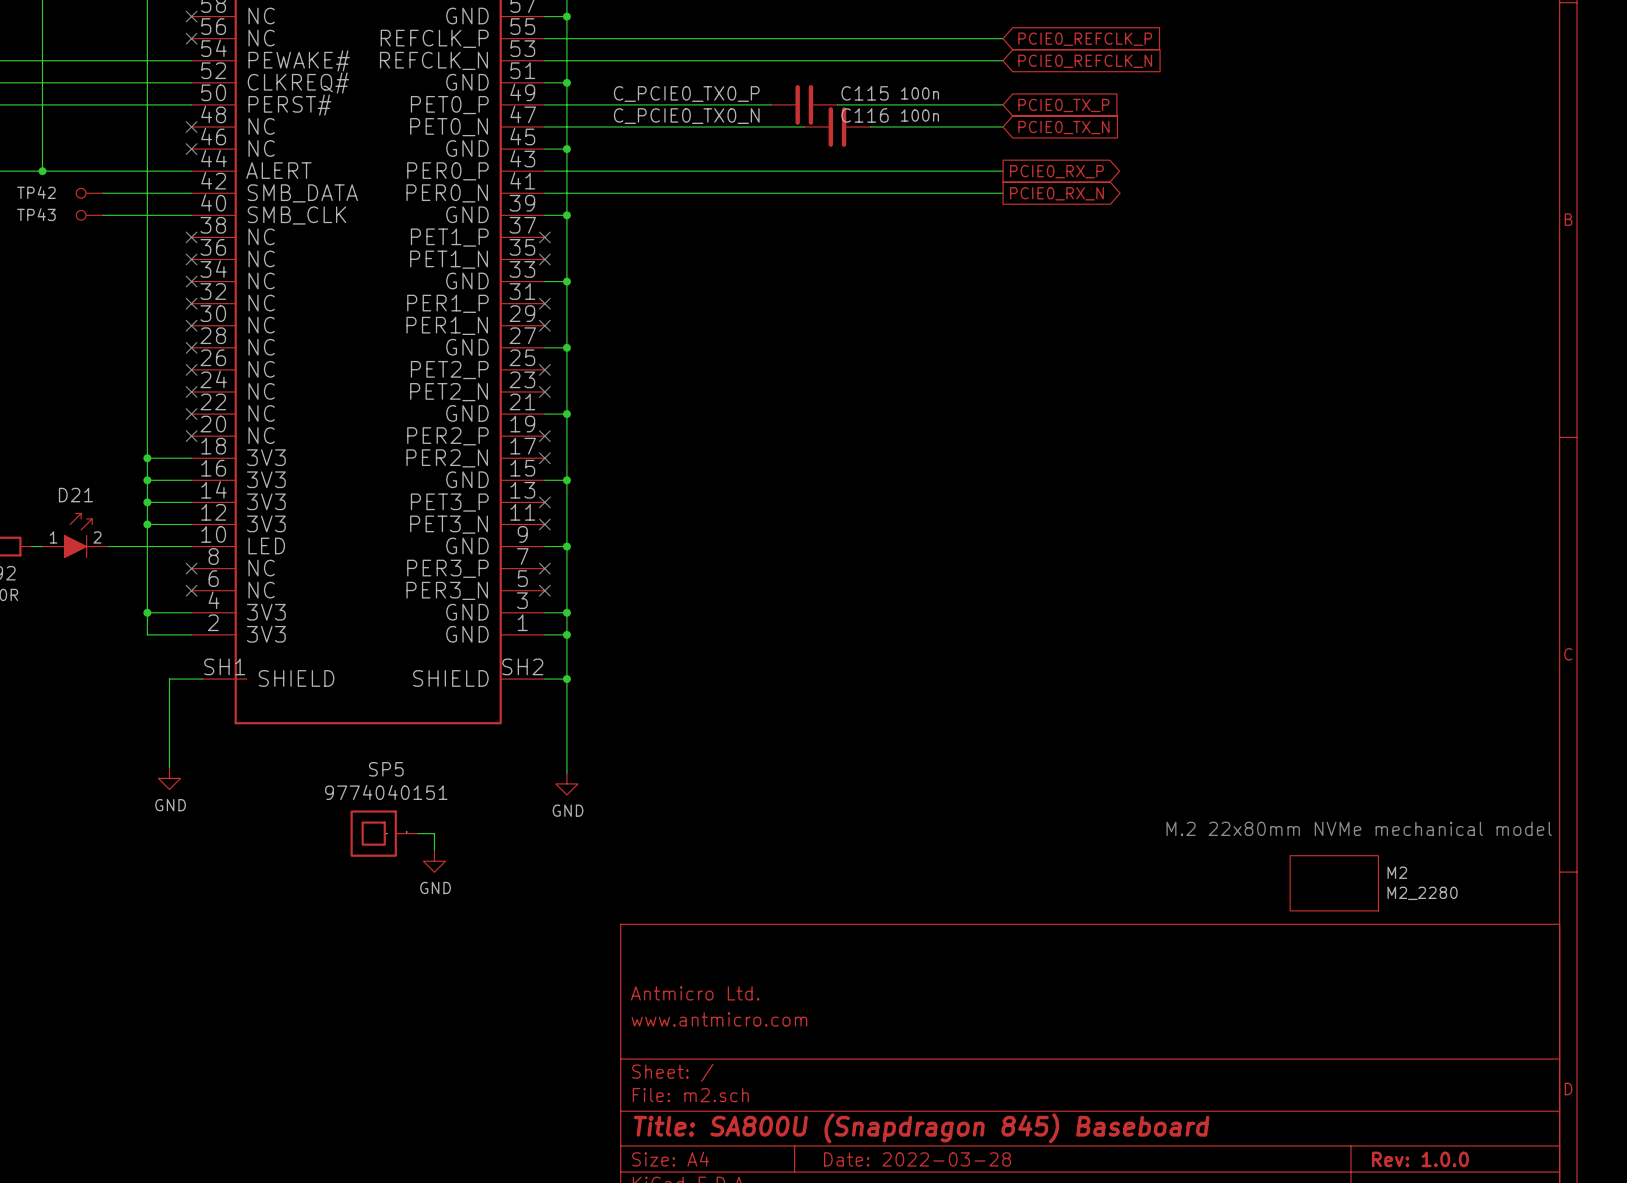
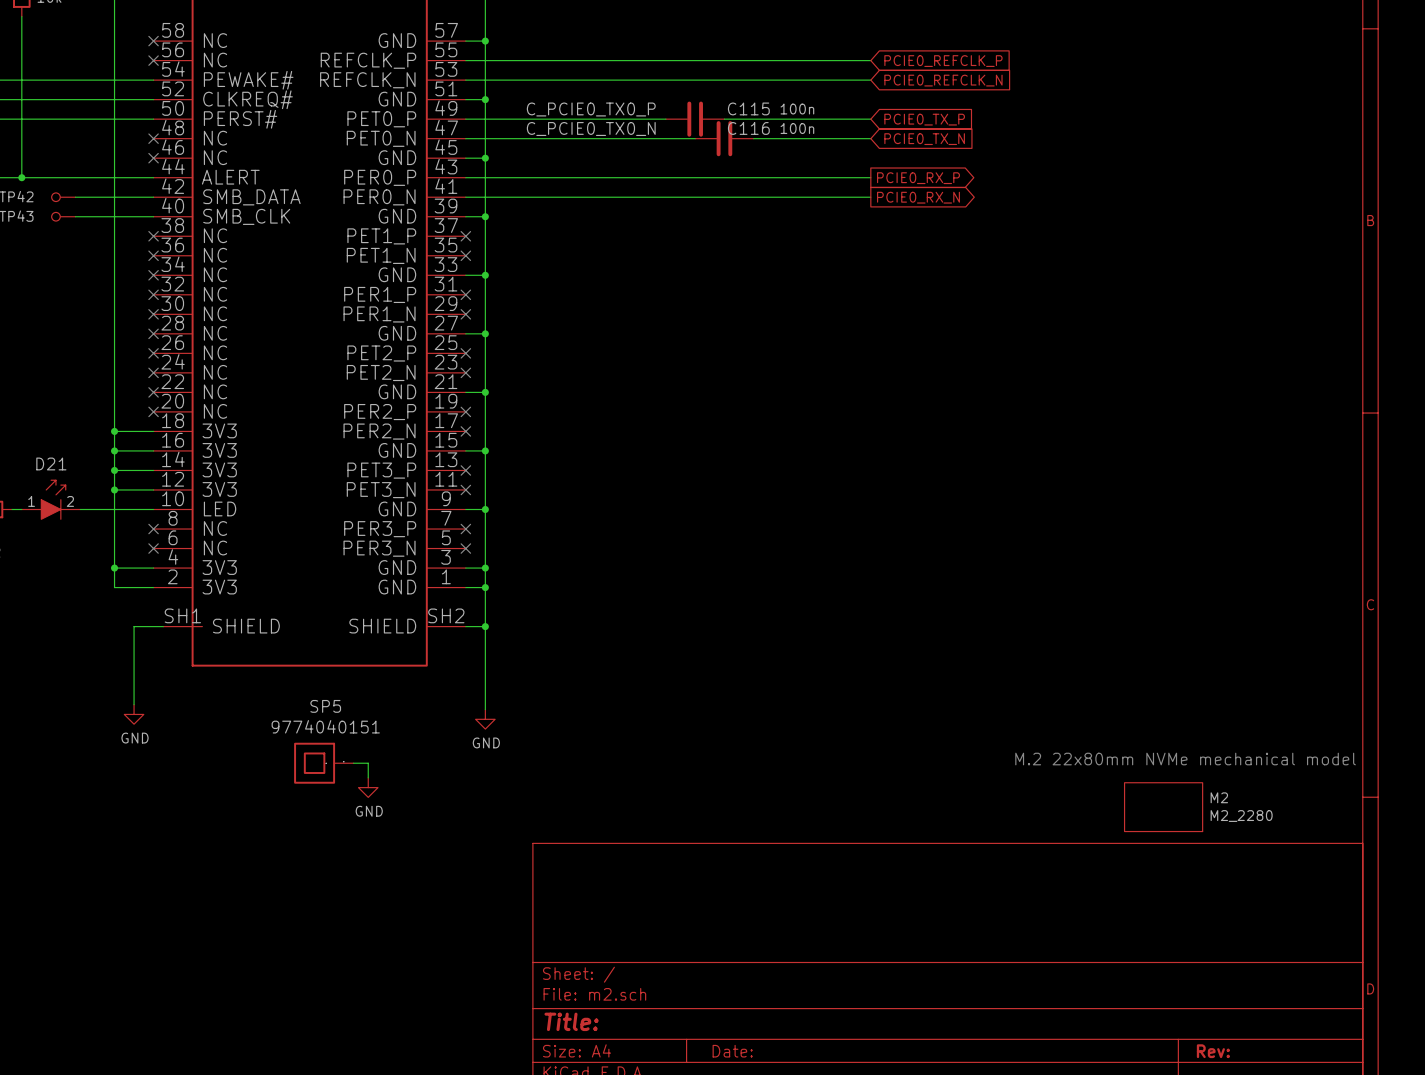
title block: Antmicro Ltd. (695, 993) -> none
title block: www.antmicro.com (719, 1019) -> none
title block: Title: SA800U (Snapdragon 845) Baseboard (921, 1128) -> Title: (571, 1021)
title block: Date: 2022-03-28 (917, 1159) -> Date: (732, 1051)
title block: Rev: 1.0.0 (1420, 1159) -> Rev: (1213, 1051)

